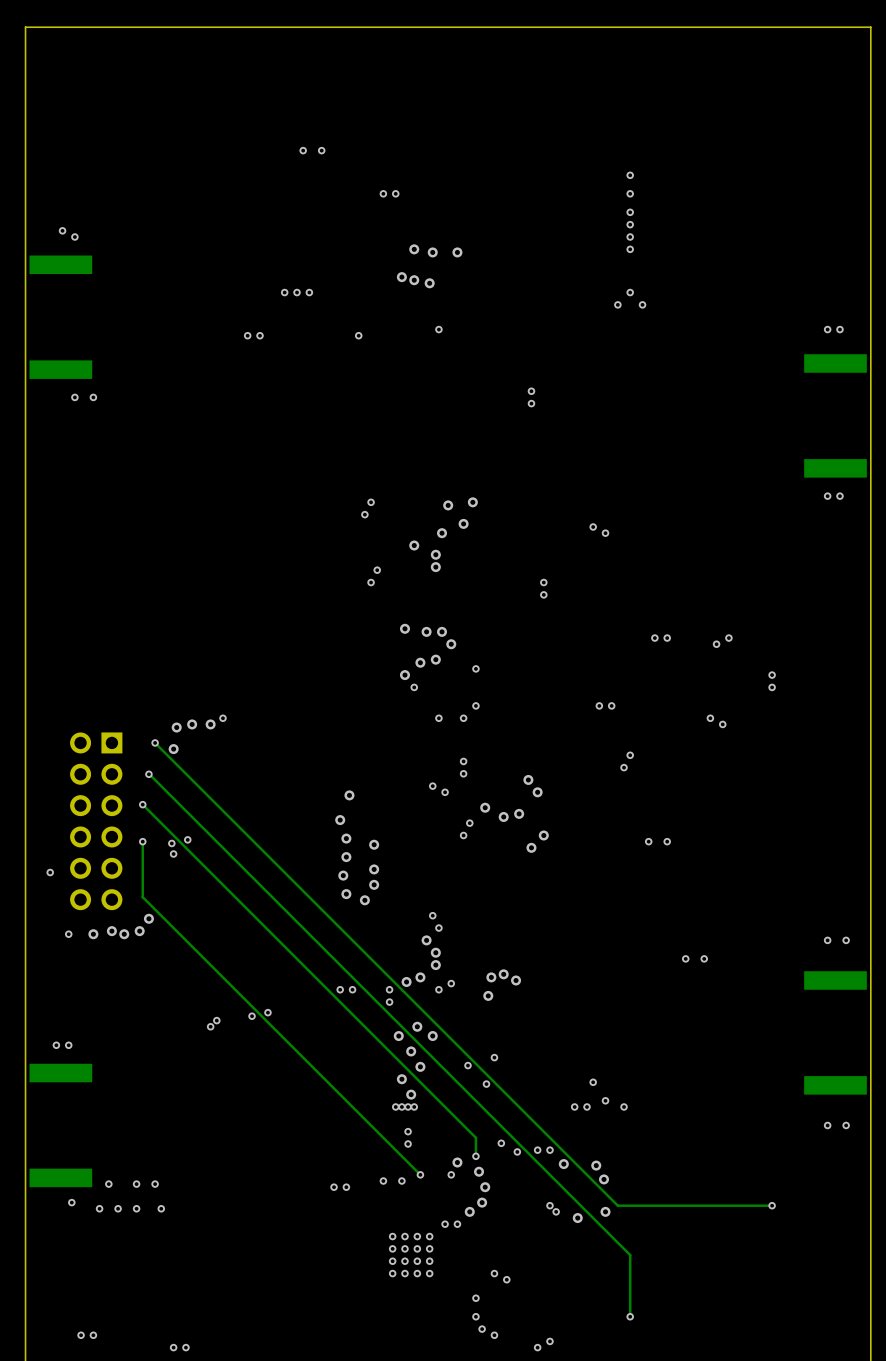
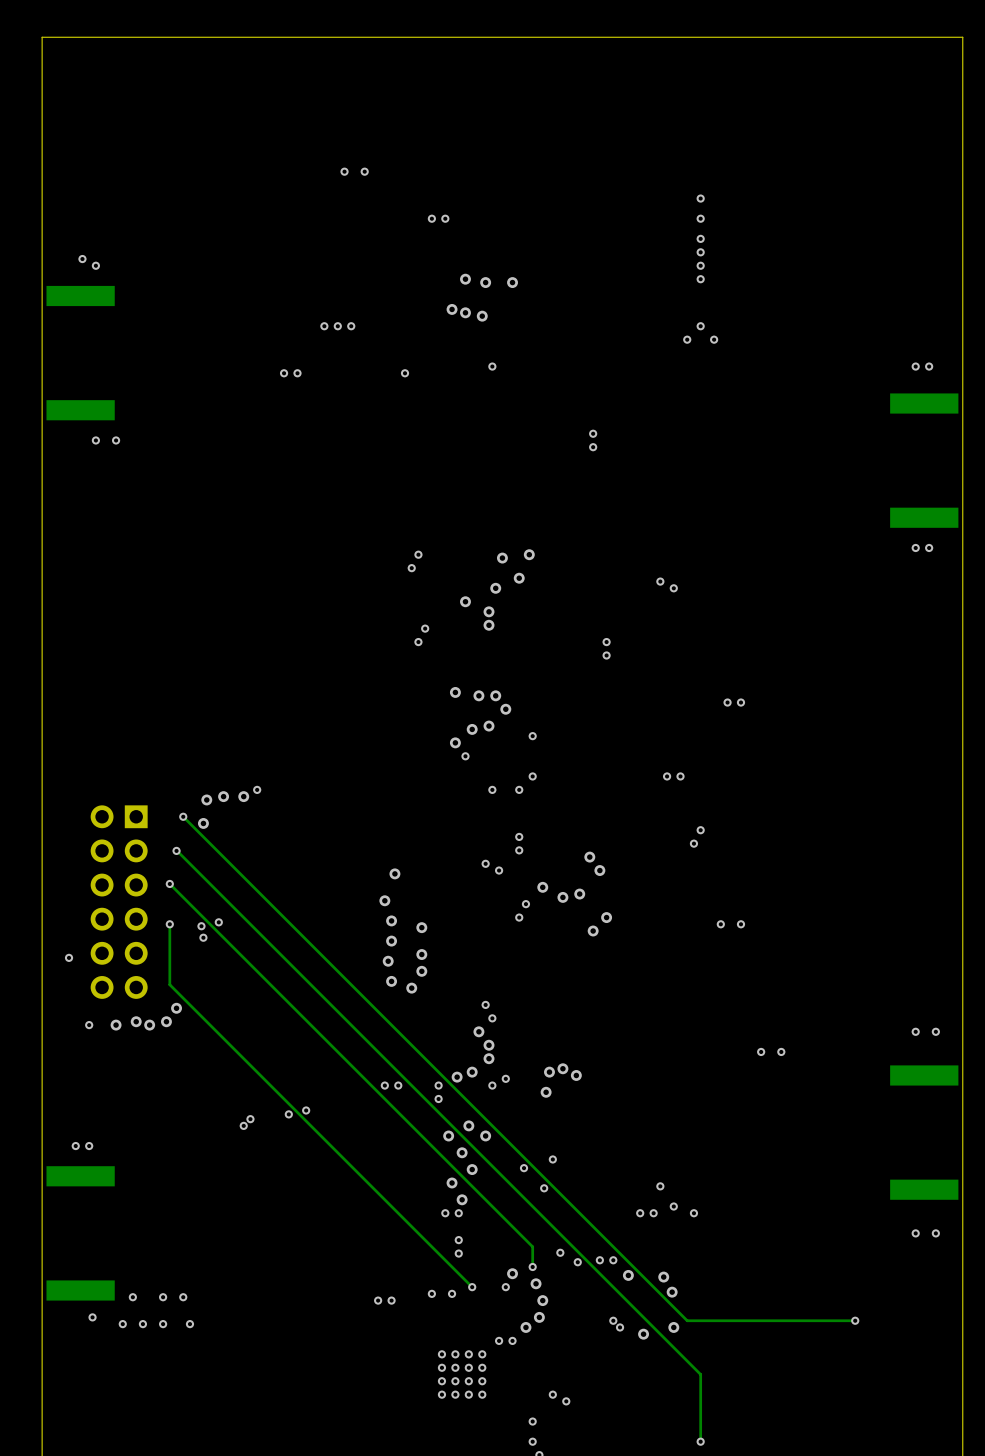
via: (728, 638) -> none
via: (716, 644) -> none
via: (772, 675) -> none
via: (772, 687) -> none
via: (710, 718) -> none
via: (722, 724) -> none
via: (401, 1106) -> none
via: (414, 1106) -> none

